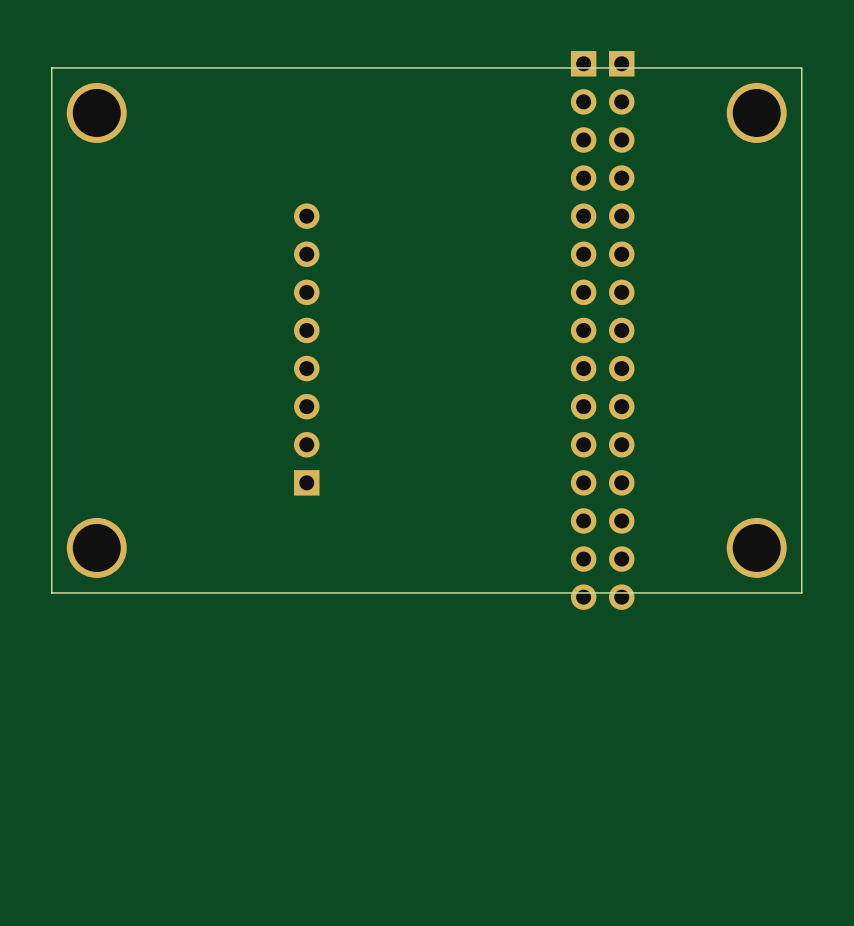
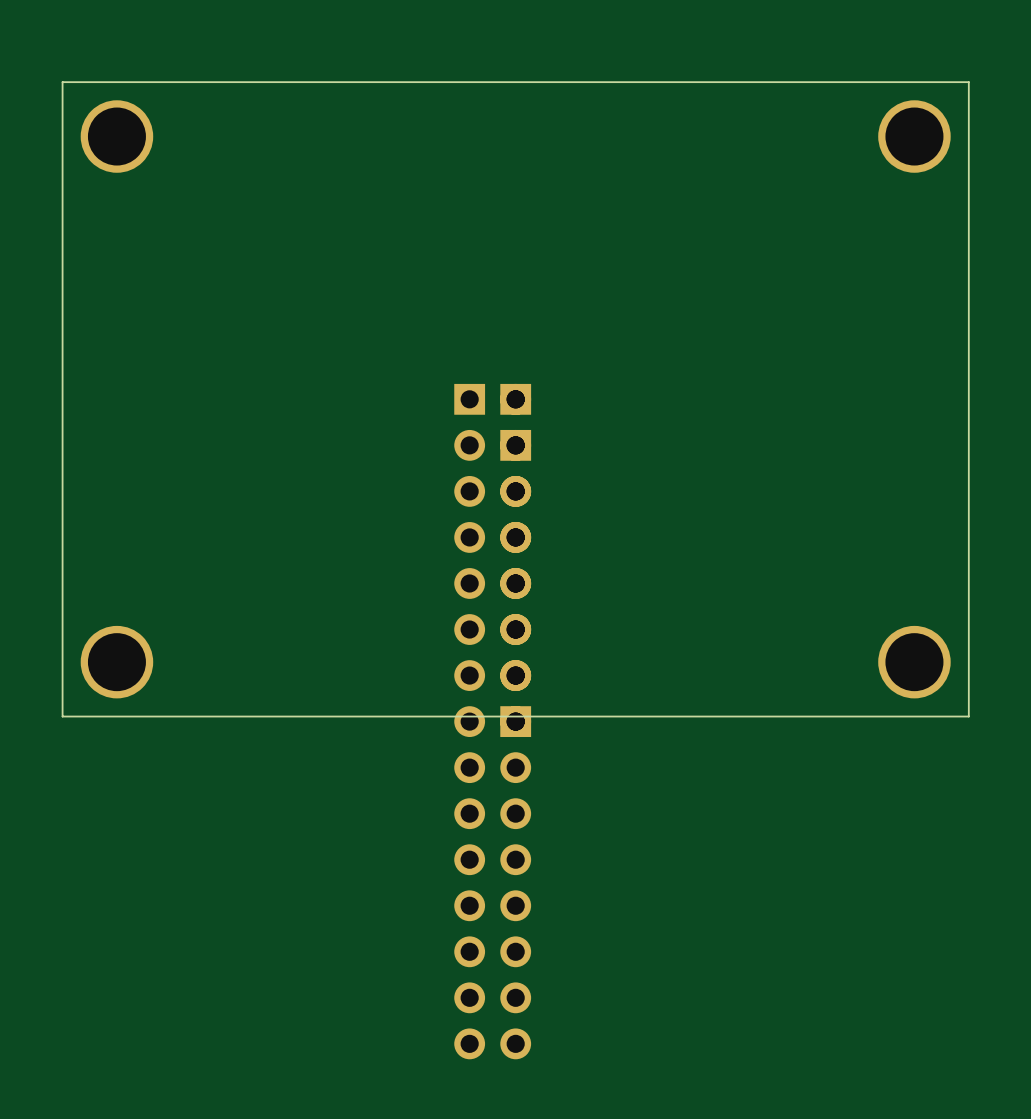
part: (602, 330) -> none
part position: (306, 349) -> (515, 560)
part: none -> (492, 721)

